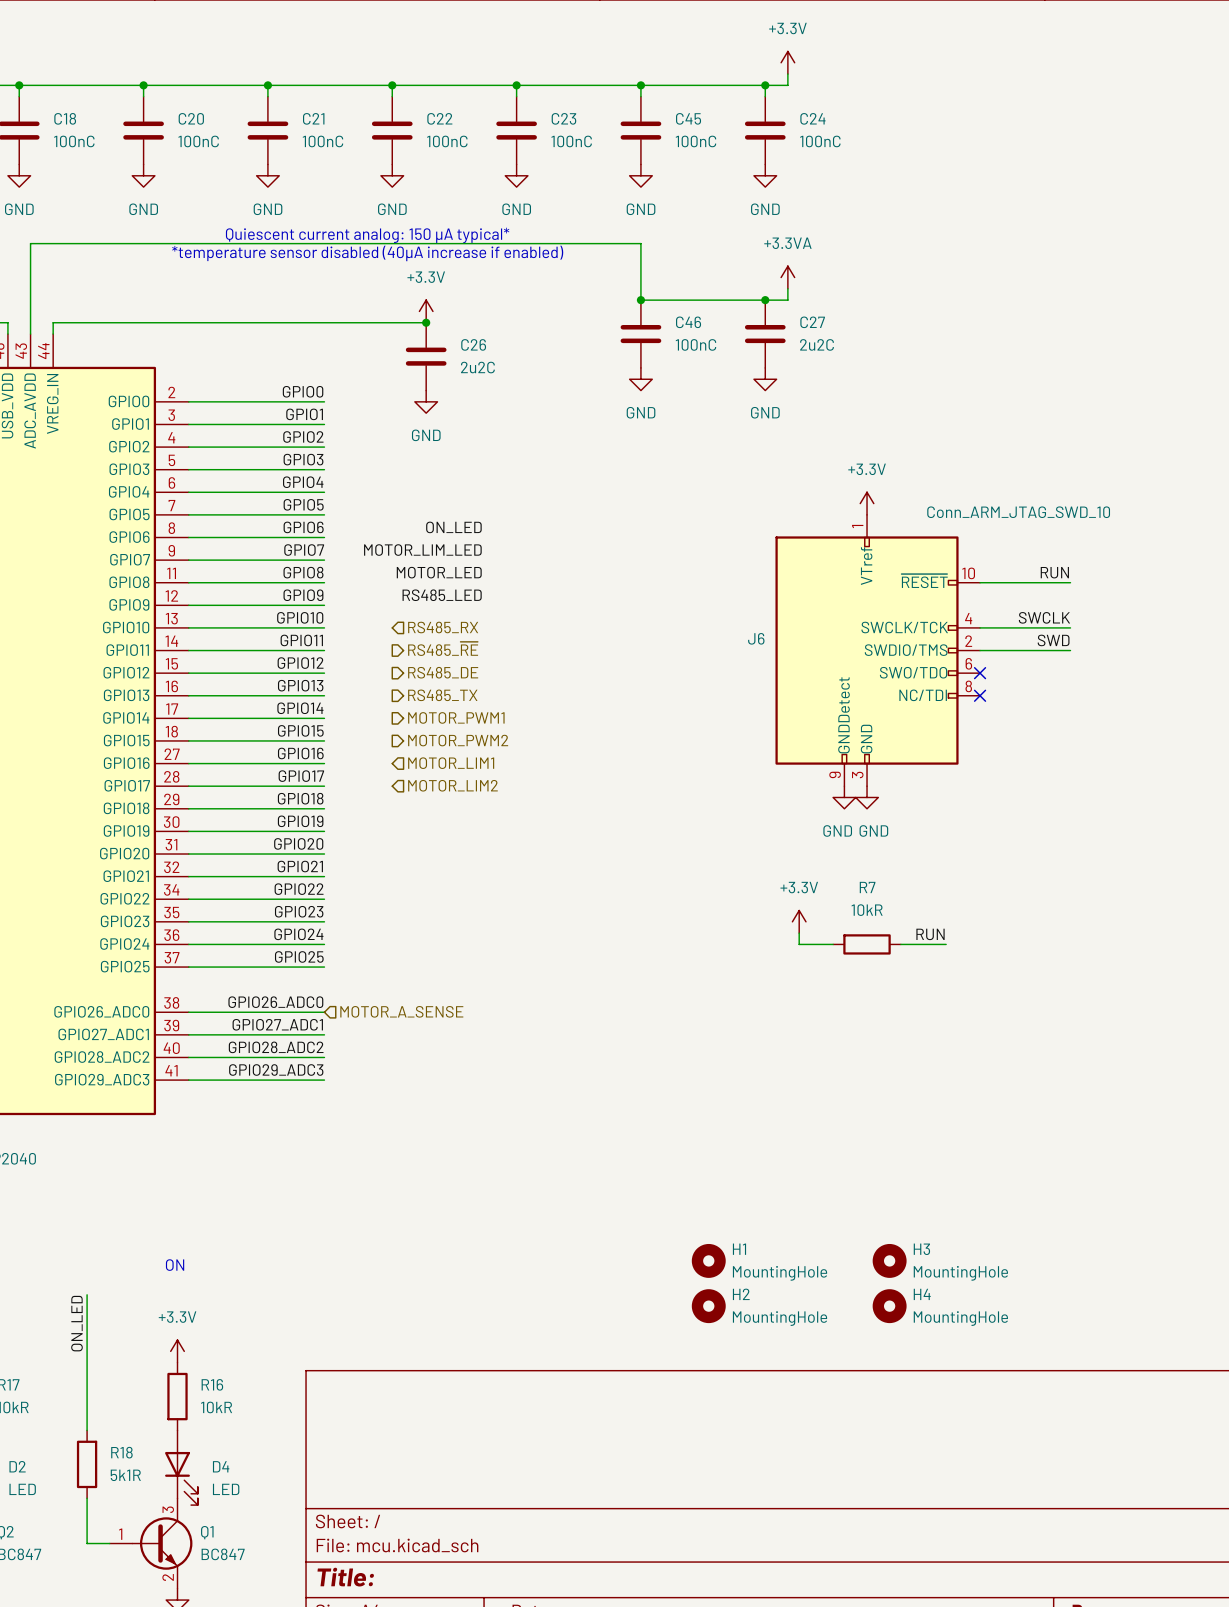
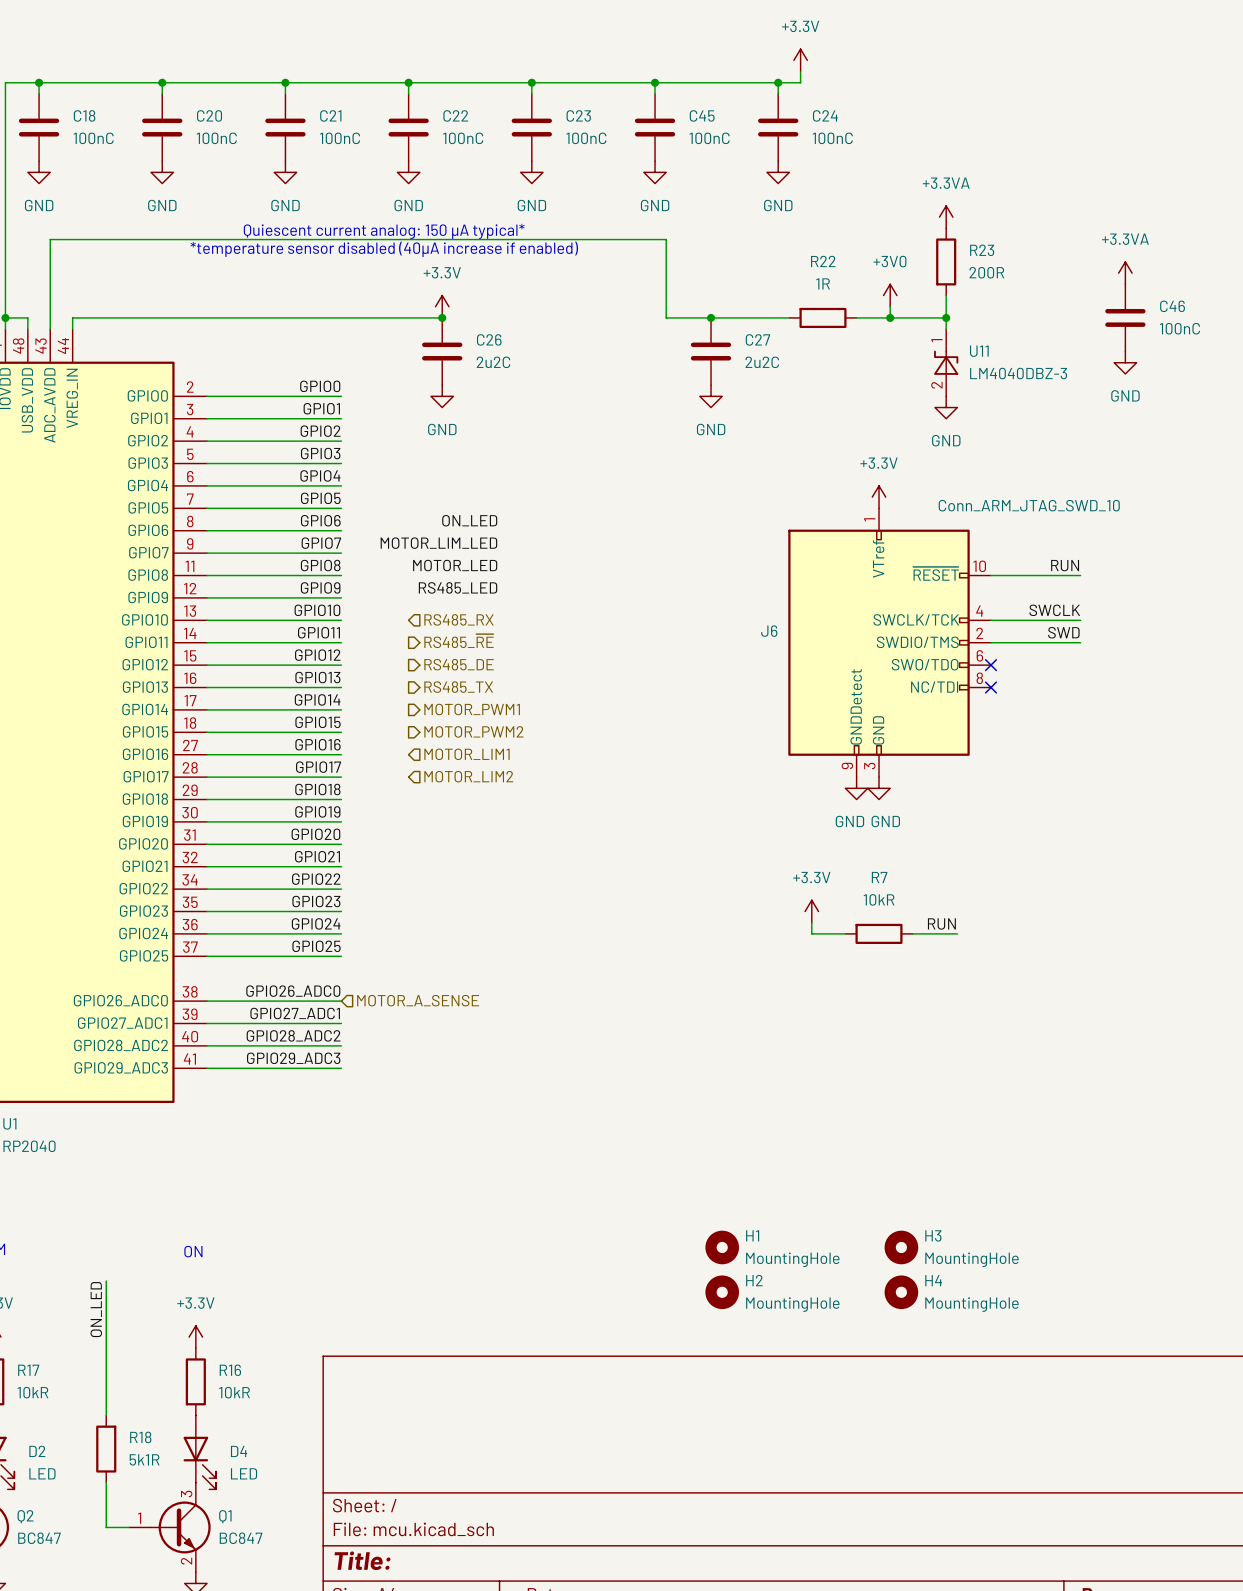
wire: (640, 243) (640, 300) (787, 300) (787, 288) -> (655, 239) (666, 239) (666, 317) (789, 317)
R23: none -> 200R (946, 261)
power symbol position: +3.3VA (787, 277) -> +3.3VA (946, 217)
power symbol: none -> +3.3VA (1125, 273)
junction: (640, 300) -> none
junction: (765, 300) -> none
power symbol: none -> +3V0 (890, 295)
wire: none -> (946, 295) (946, 329)
wire: none -> (890, 306) (890, 317)
junction: none -> (711, 317)
R22: none -> 1R (823, 317)
wire: none -> (856, 317) (946, 317)
junction: none -> (890, 317)
junction: none -> (946, 317)
C46 position: (640, 334) -> (1125, 317)
C27 position: (765, 334) -> (711, 351)
U11: none -> LM4040DBZ-3 (946, 362)
power symbol: none -> GND (1125, 362)
power symbol: GND (640, 379) -> none
power symbol: GND (765, 379) -> none
power symbol: none -> GND (711, 396)
power symbol: none -> GND (946, 407)

